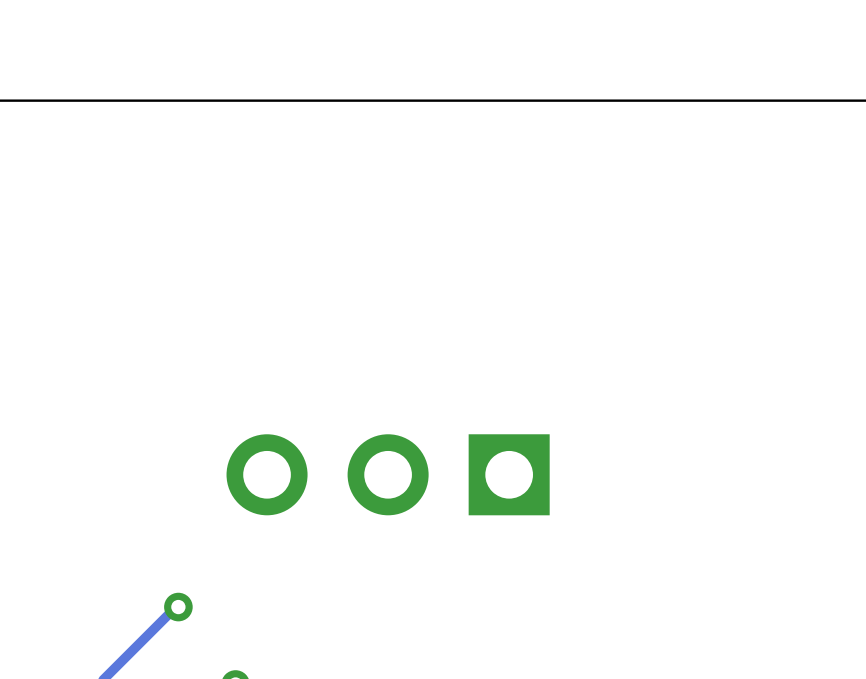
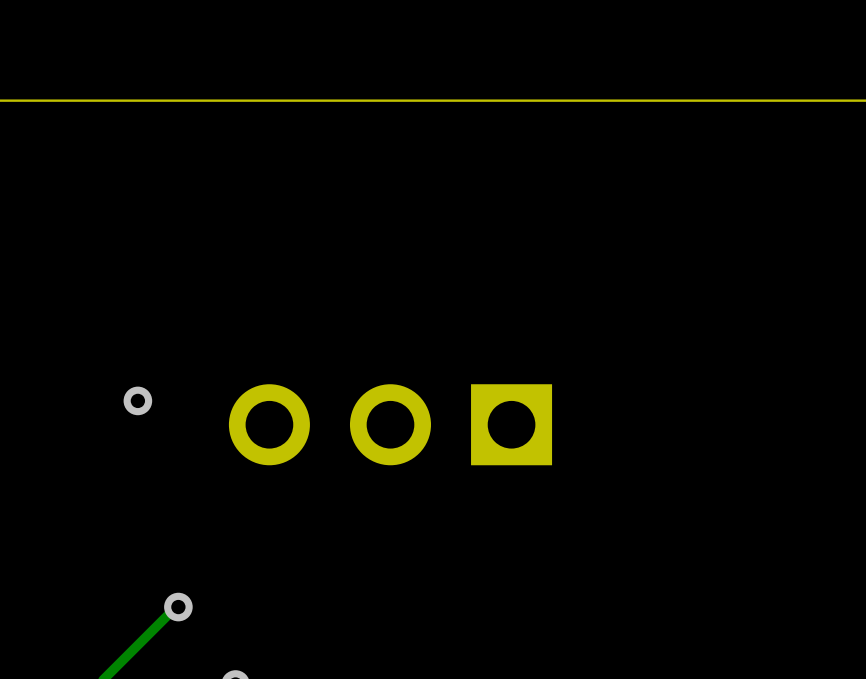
via: none -> (137, 400)
part position: (388, 474) -> (390, 424)

